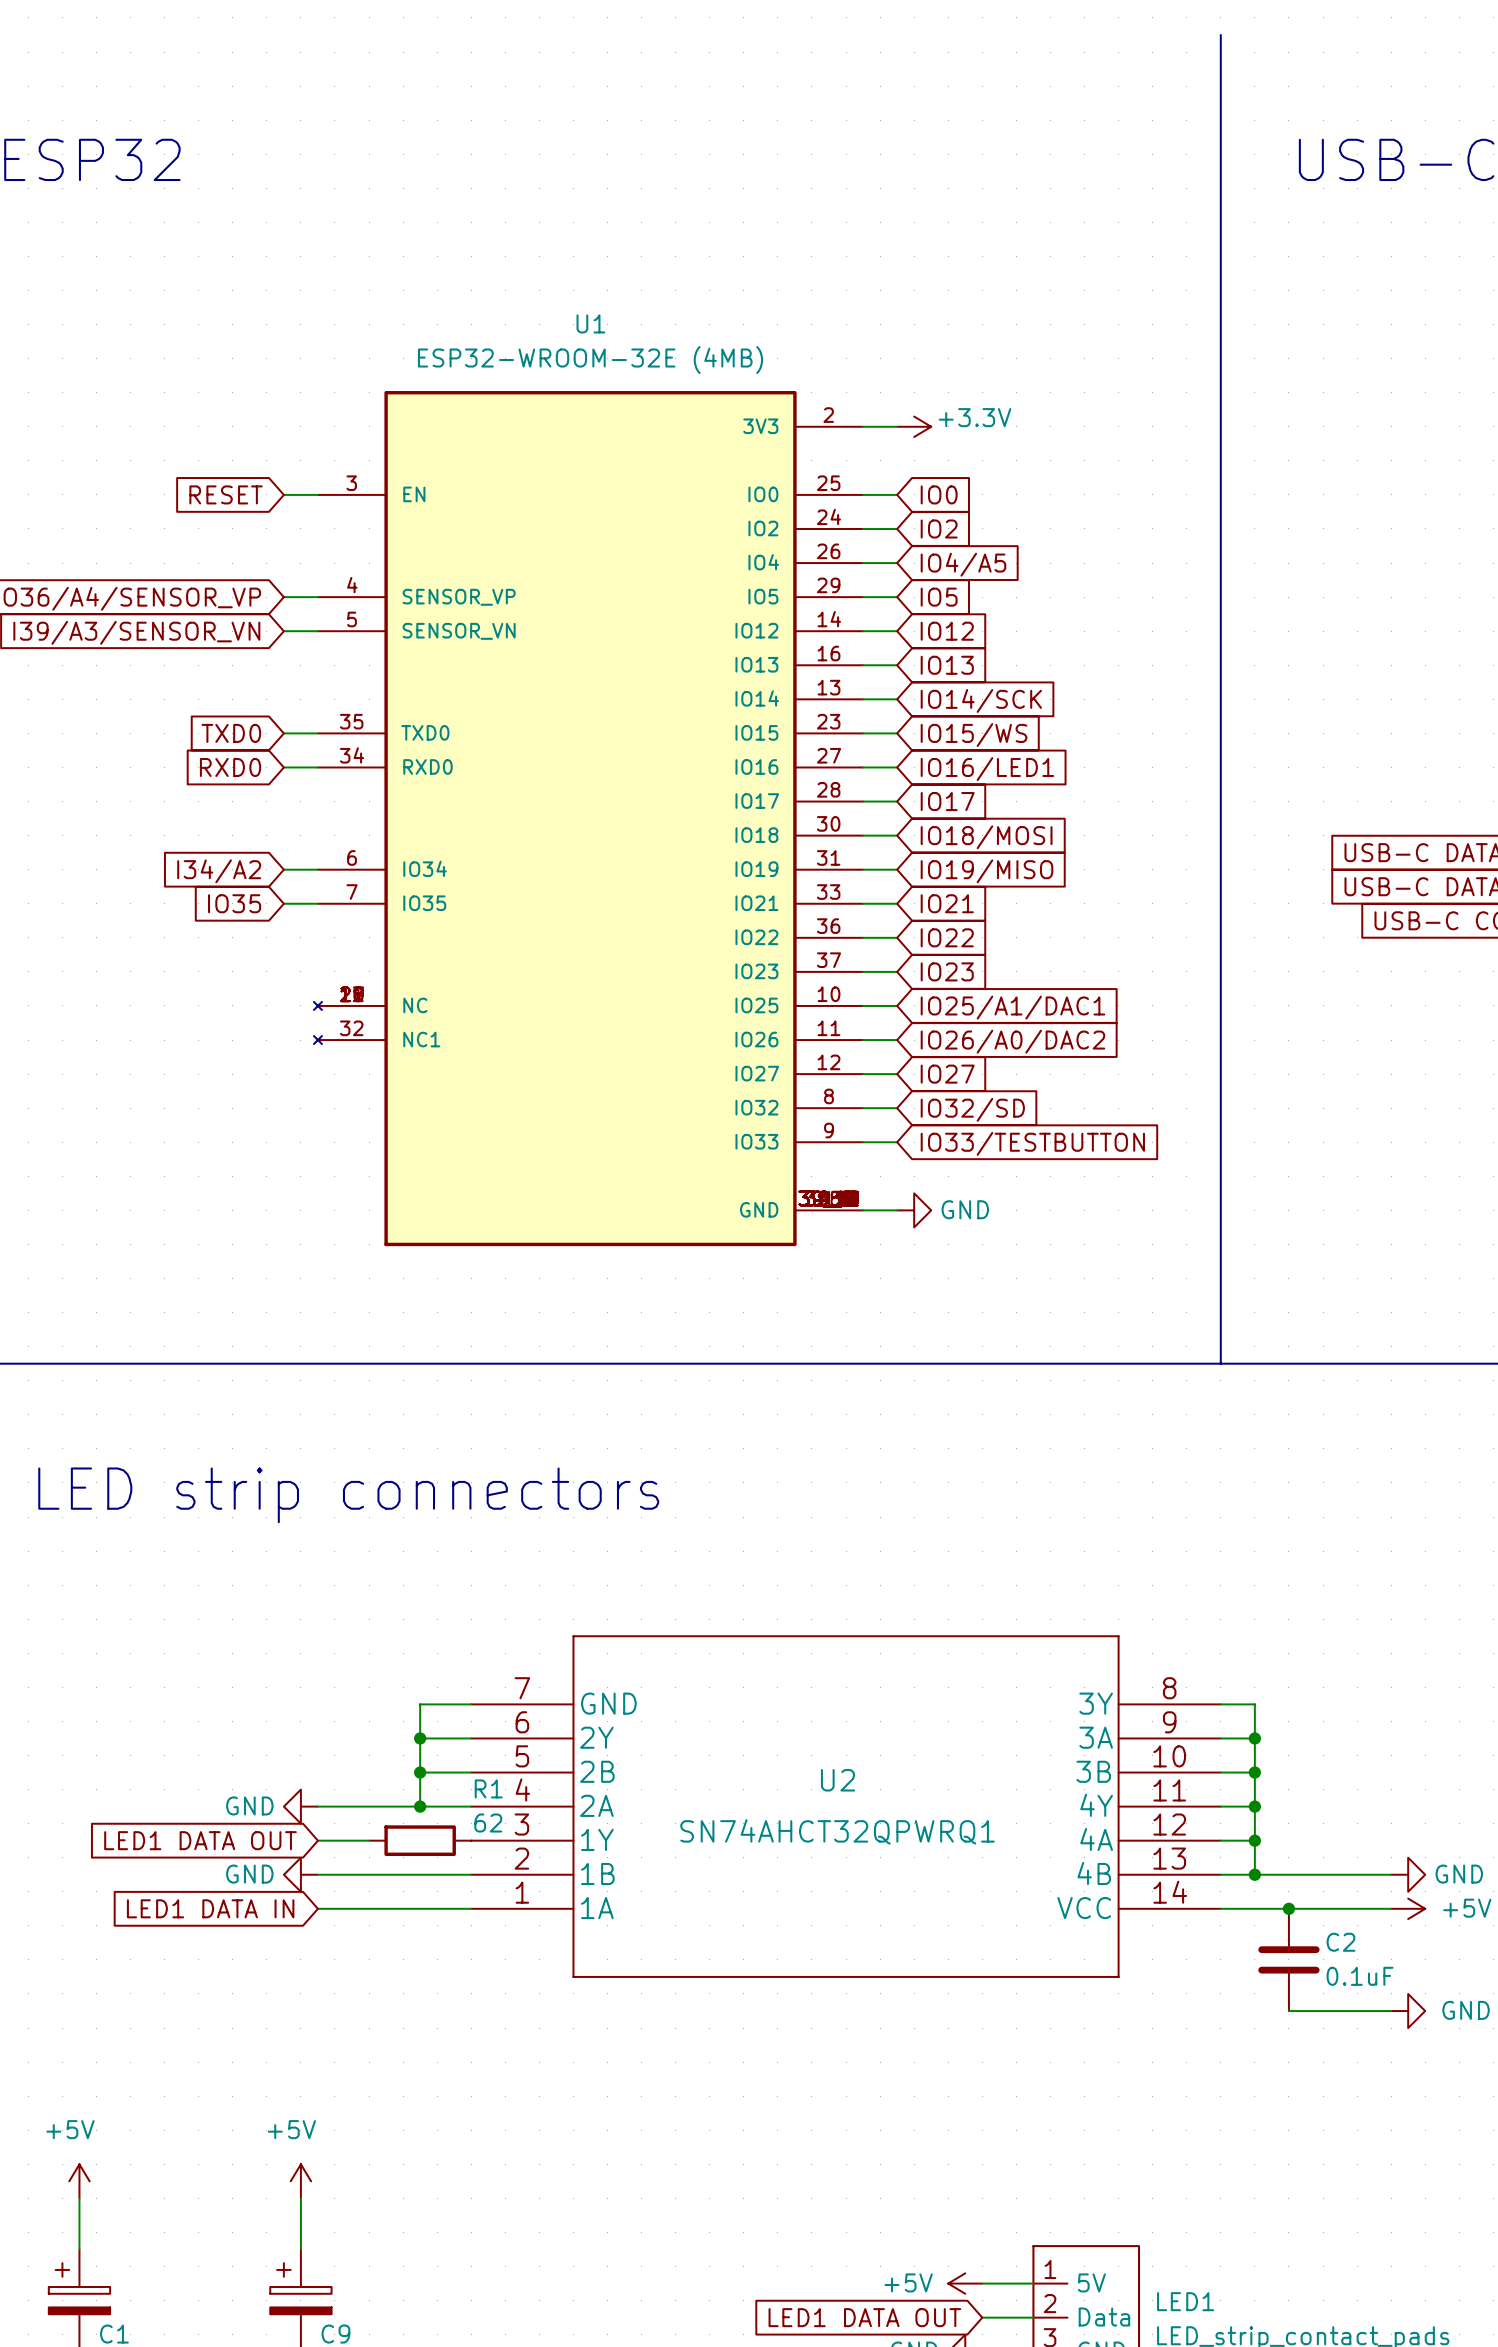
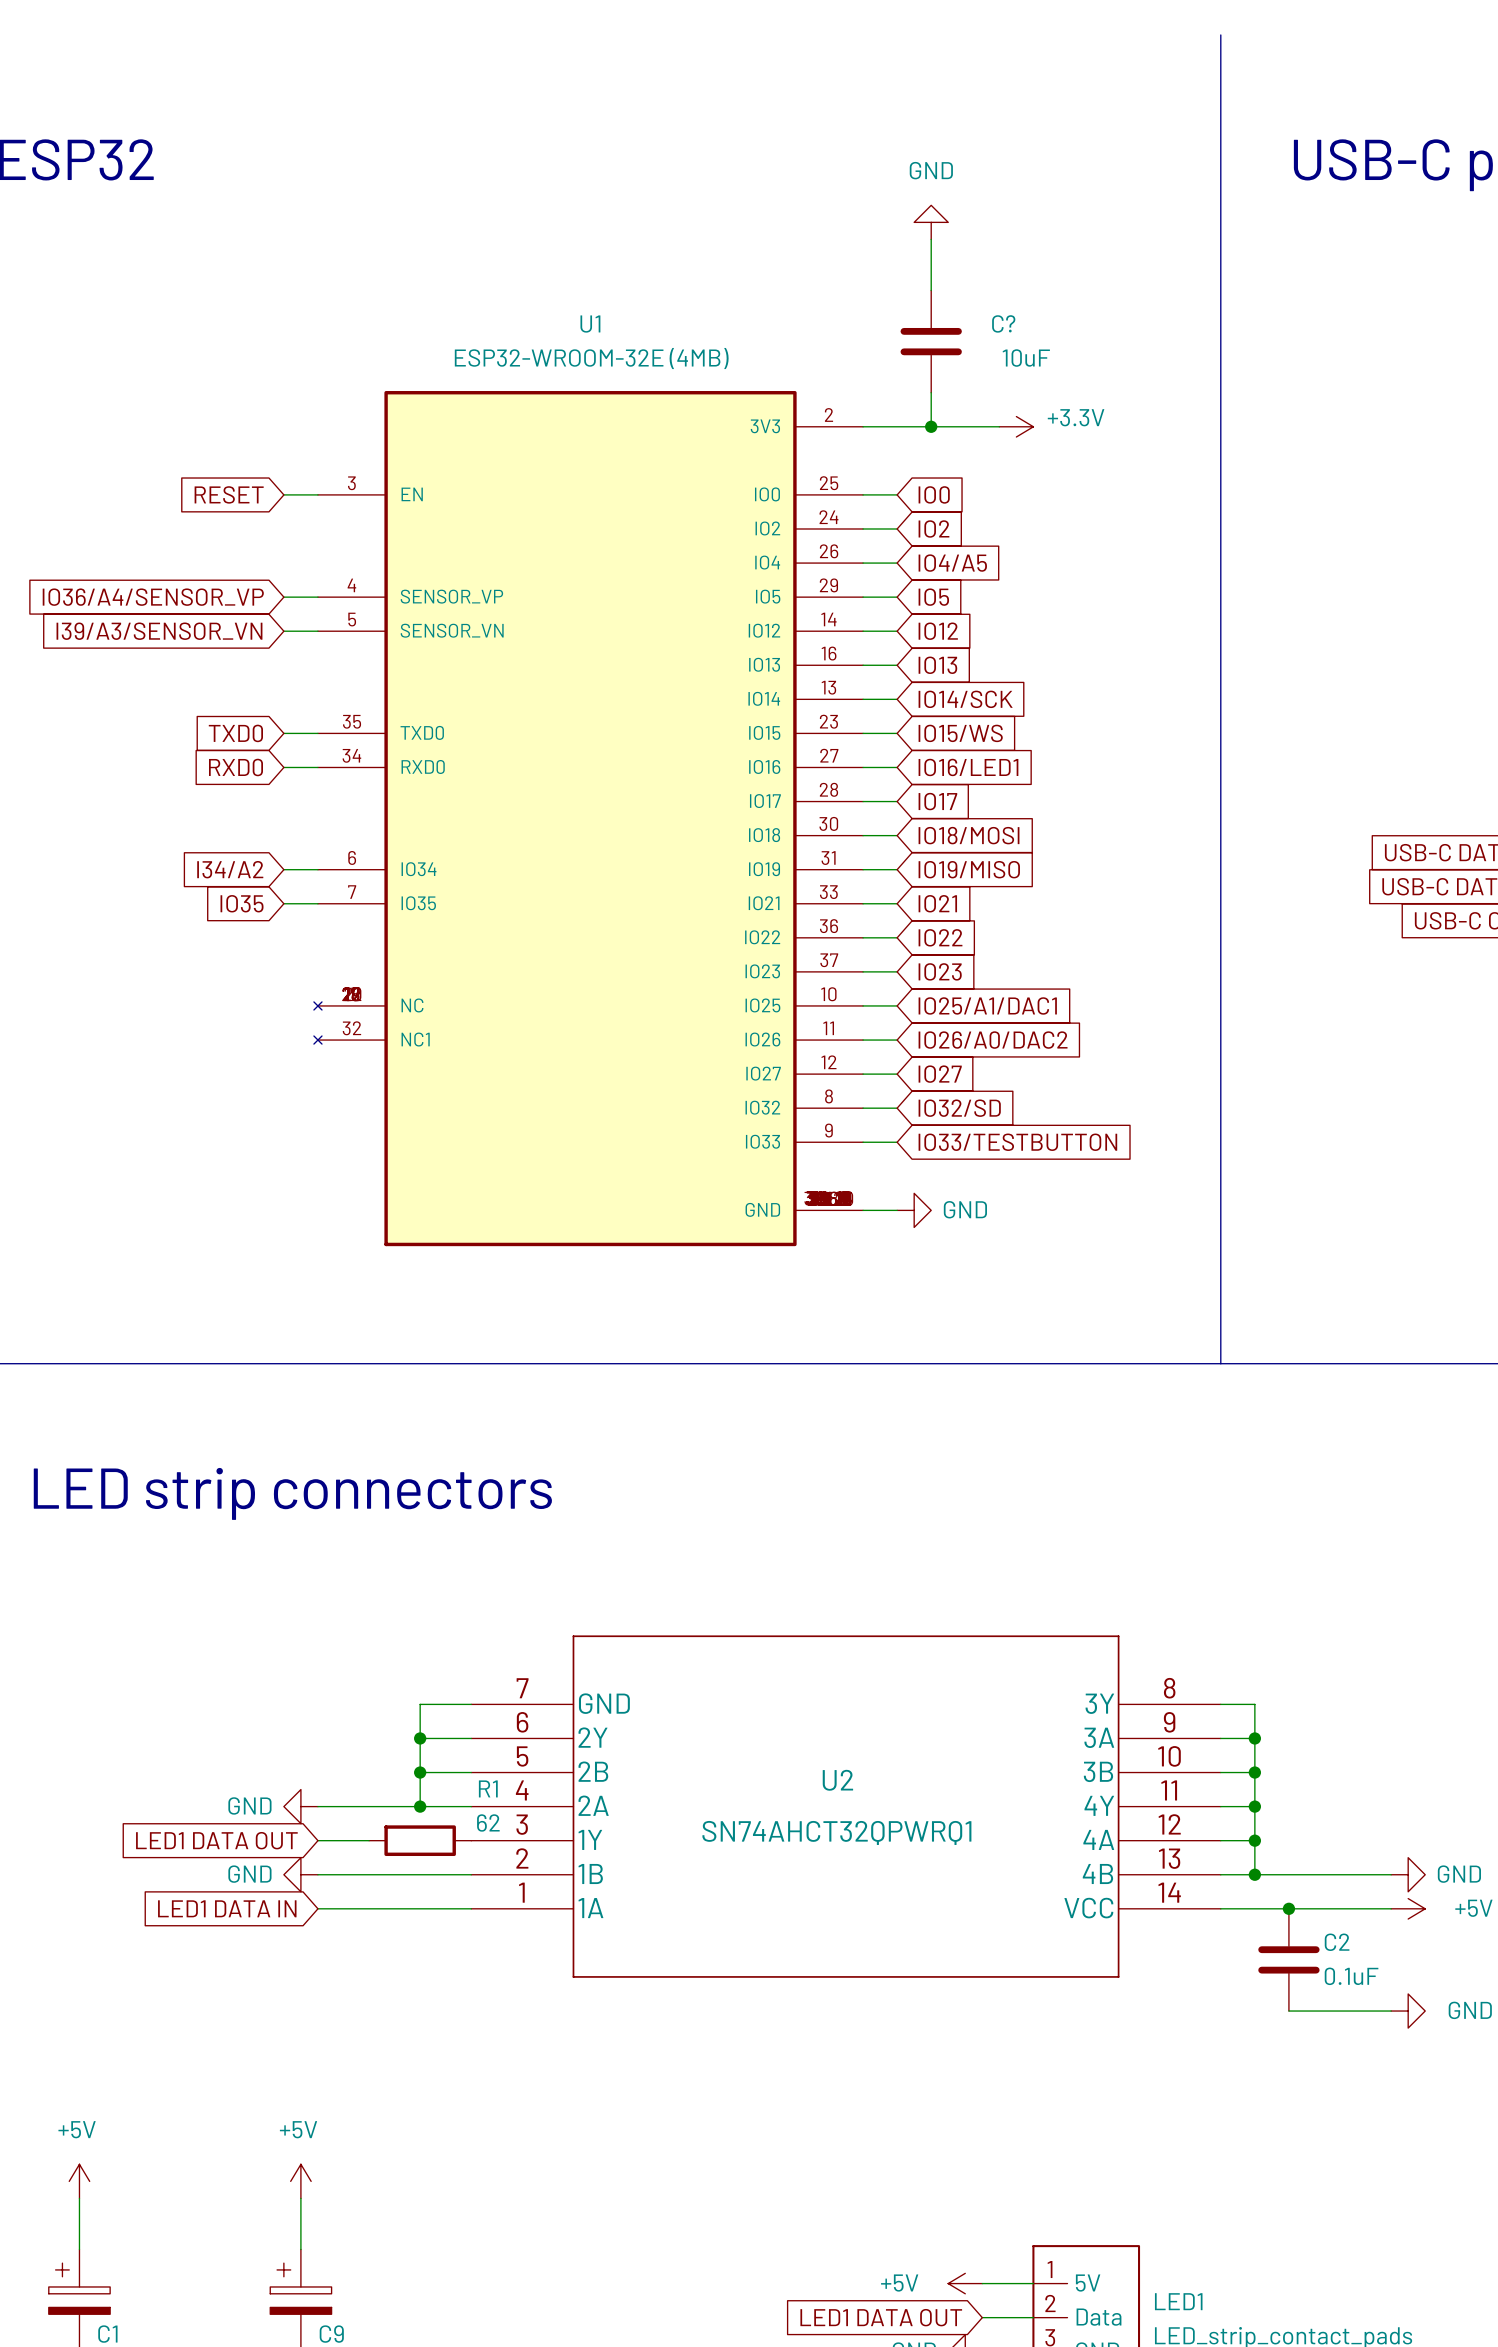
power symbol: none -> GND (931, 222)
wire: none -> (931, 239) (931, 290)
C?: none -> 10uF (931, 341)
wire: none -> (931, 392) (931, 426)
wire: none -> (897, 426) (999, 426)
power symbol position: +3.3V (914, 426) -> +3.3V (1016, 426)
junction: none -> (931, 426)

